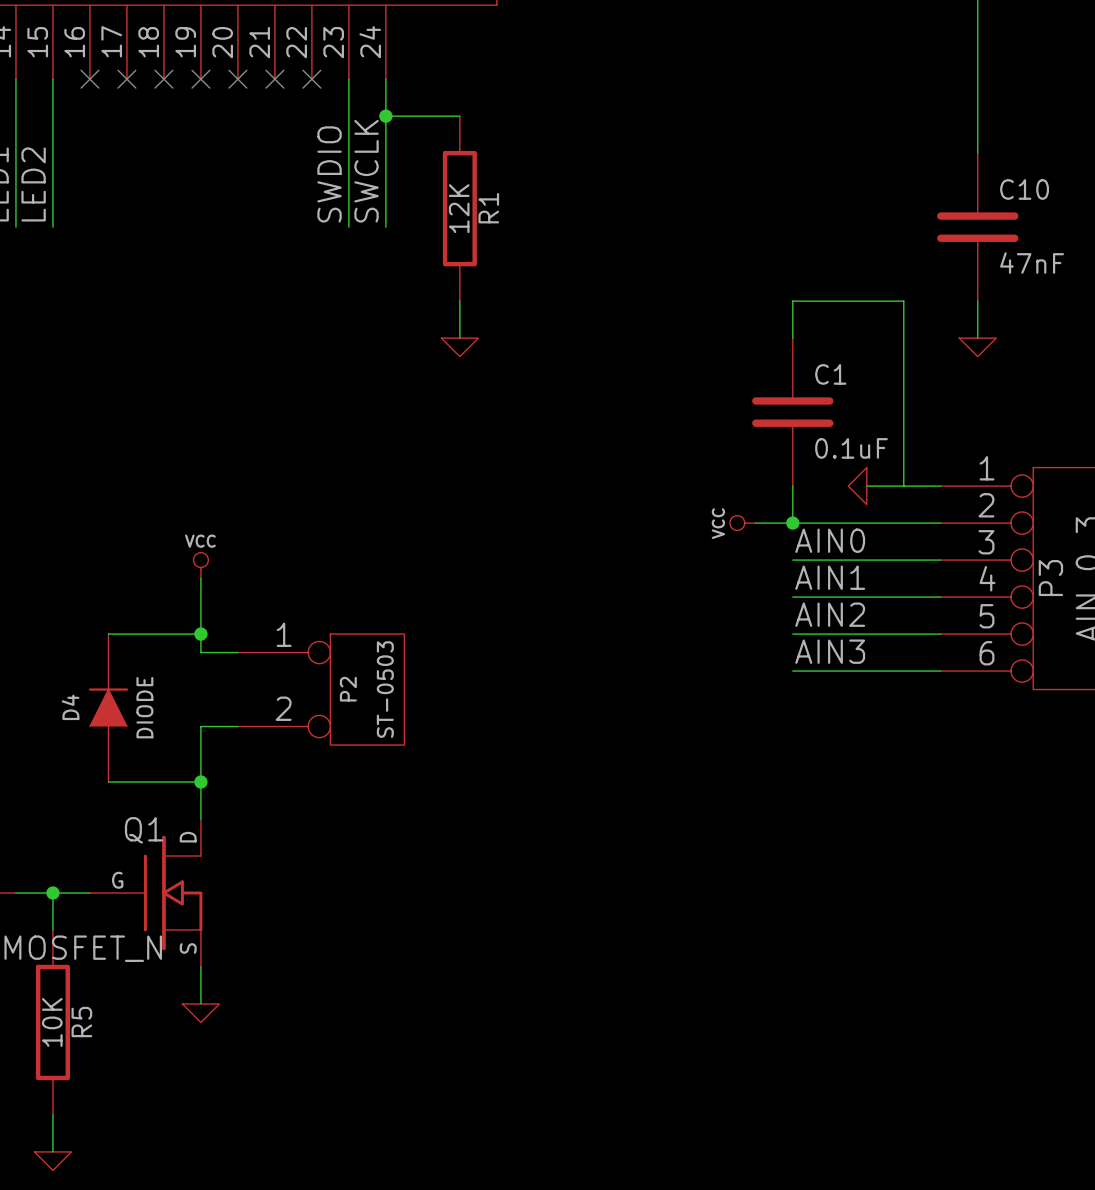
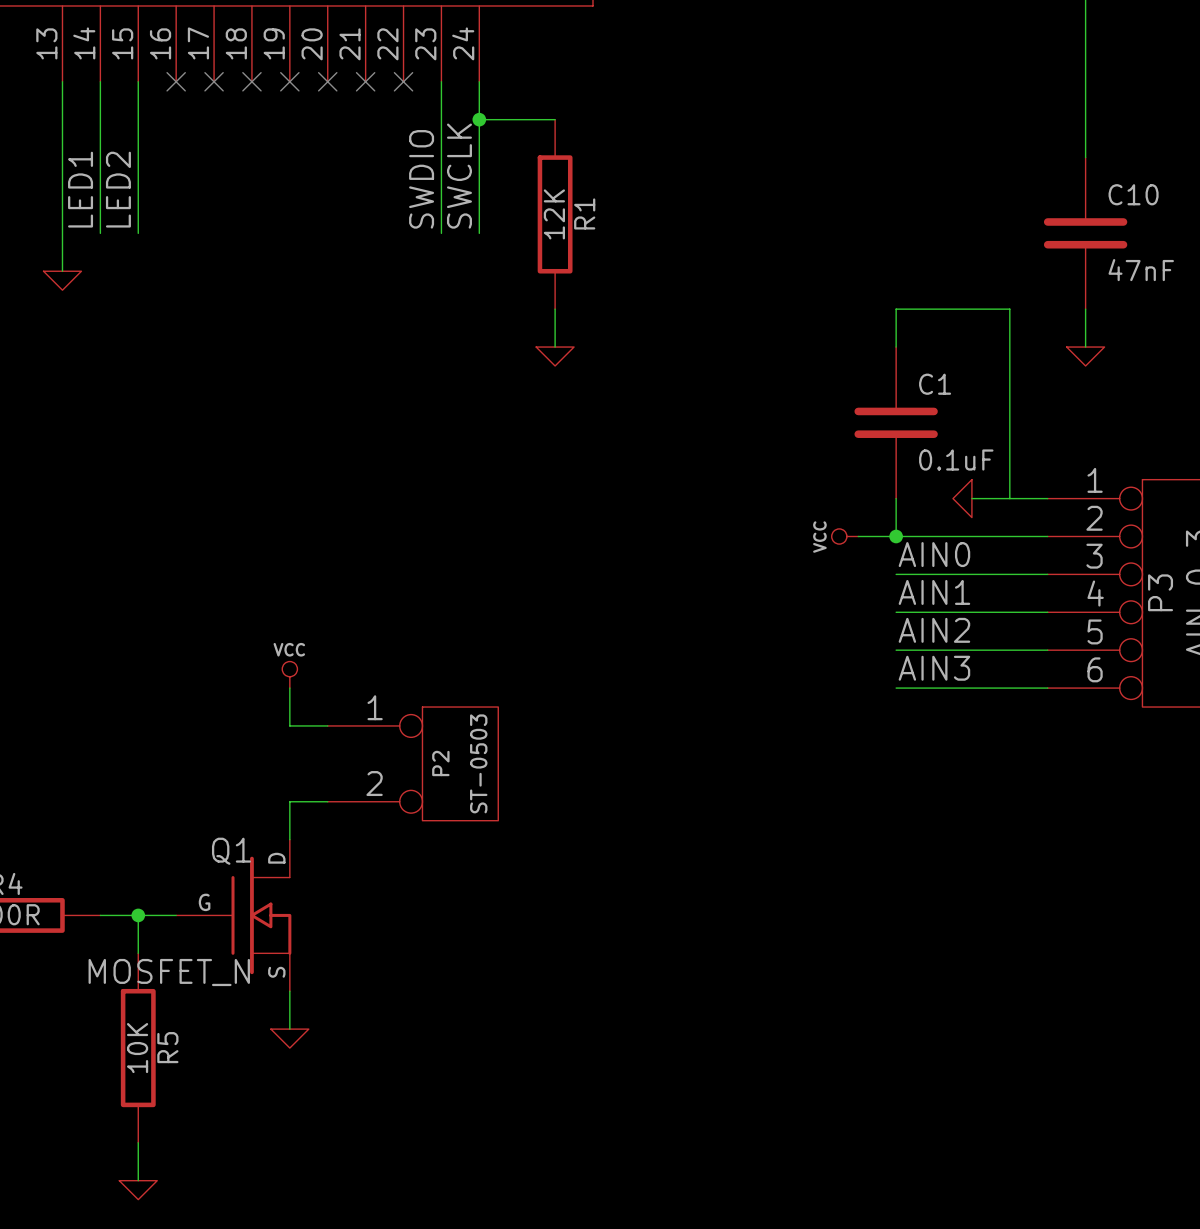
power symbol position: VCC (200, 565) -> VCC (289, 674)
wire: (200, 578) (200, 652) (237, 652) -> none
wire: (108, 634) (200, 634) -> none
junction: (200, 634) -> none
wire: none -> (289, 688) (289, 725) (327, 725)
P2 position: (321, 689) -> (413, 763)
D4: DIODE (108, 708) -> none
wire: (237, 726) (200, 726) (200, 782) (108, 782) -> none
wire: none -> (289, 801) (327, 801)
junction: (200, 782) -> none

